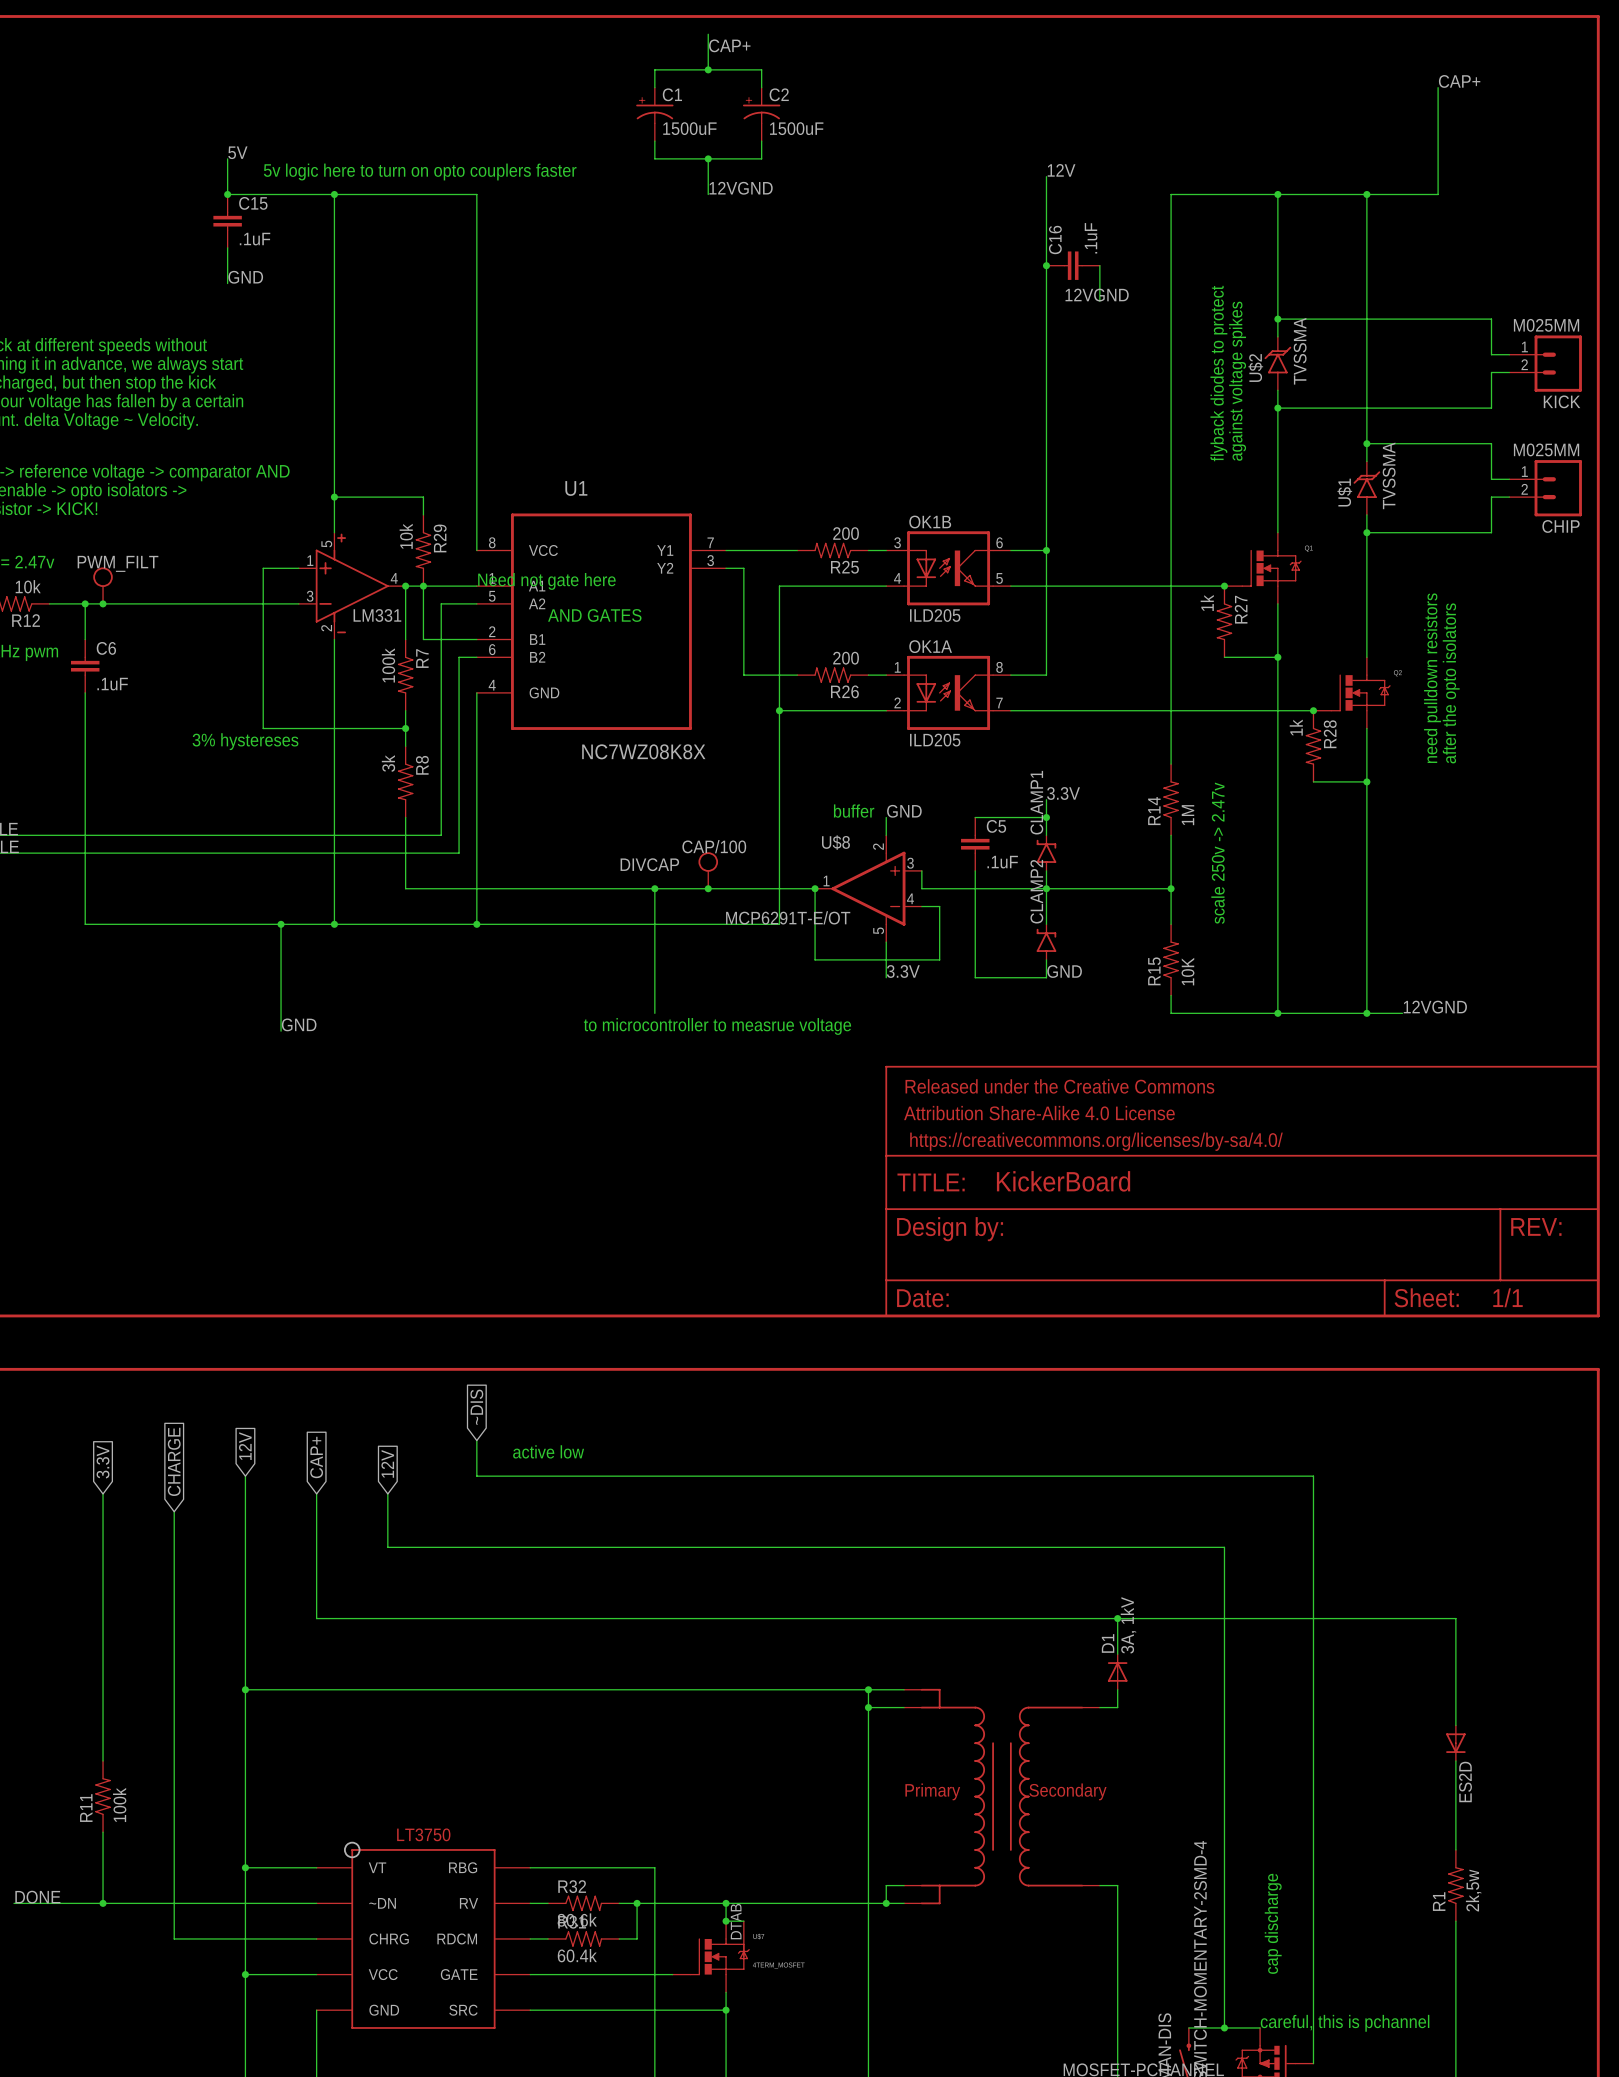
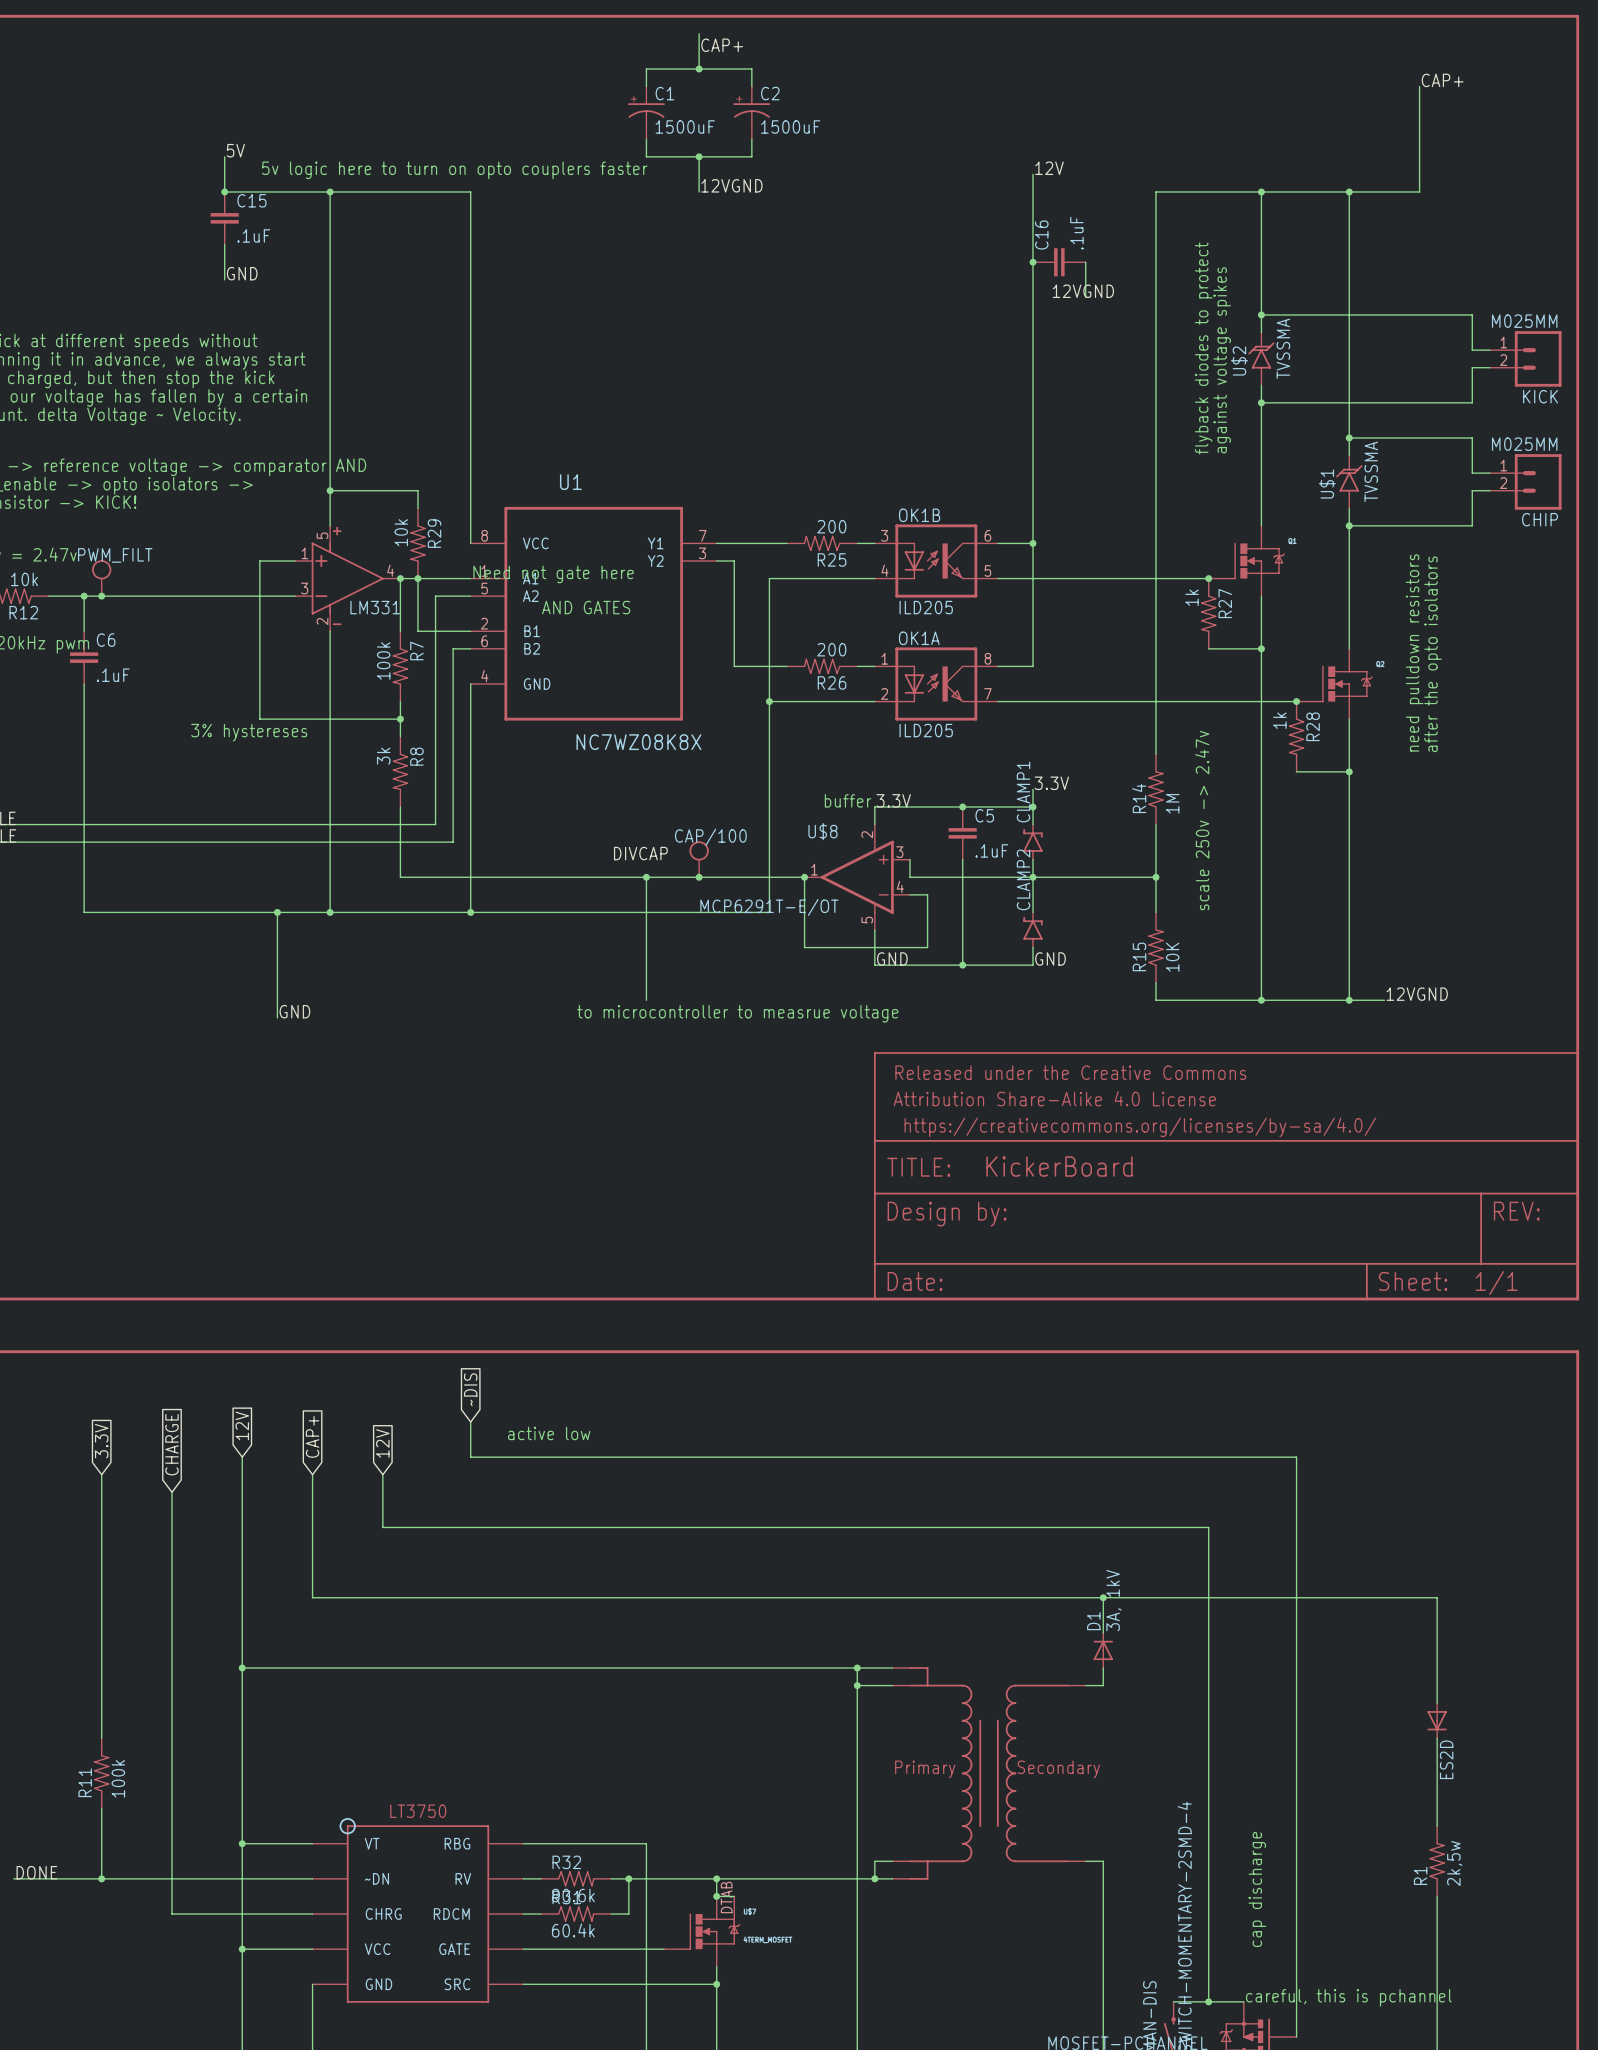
label: GND (904, 811) -> 3.3V (893, 800)
wire: none -> (874, 807) (962, 807)
junction: none -> (962, 807)
label: 3.3V (903, 971) -> GND (892, 958)
wire: none -> (874, 965) (962, 965)
junction: none -> (962, 965)

